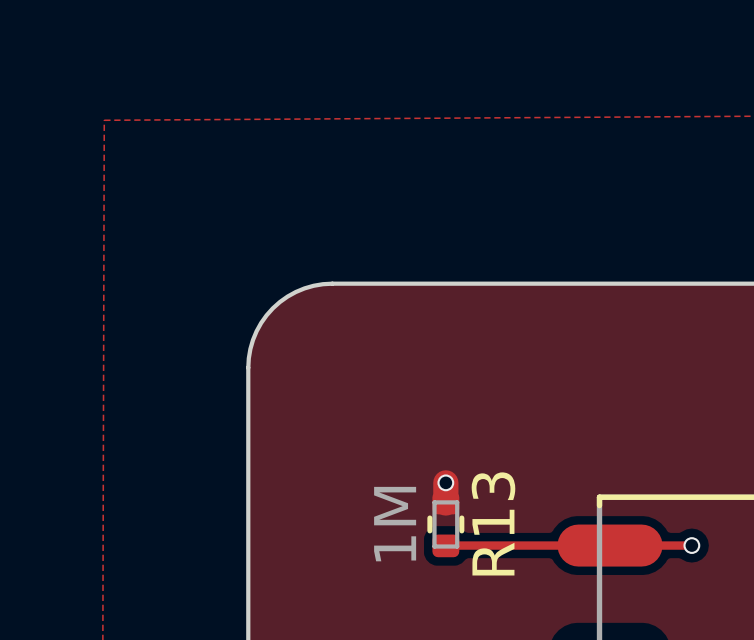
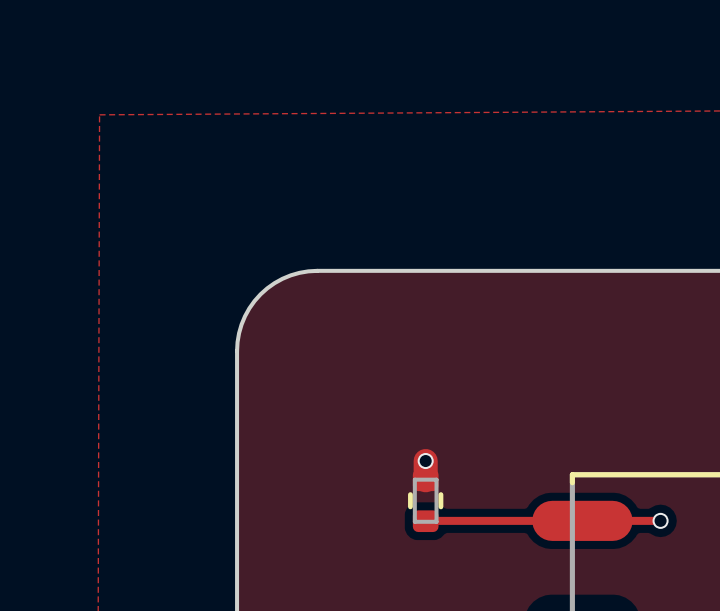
R13 name: R13 (493, 523) -> none
R13 value: 1M (395, 524) -> none

